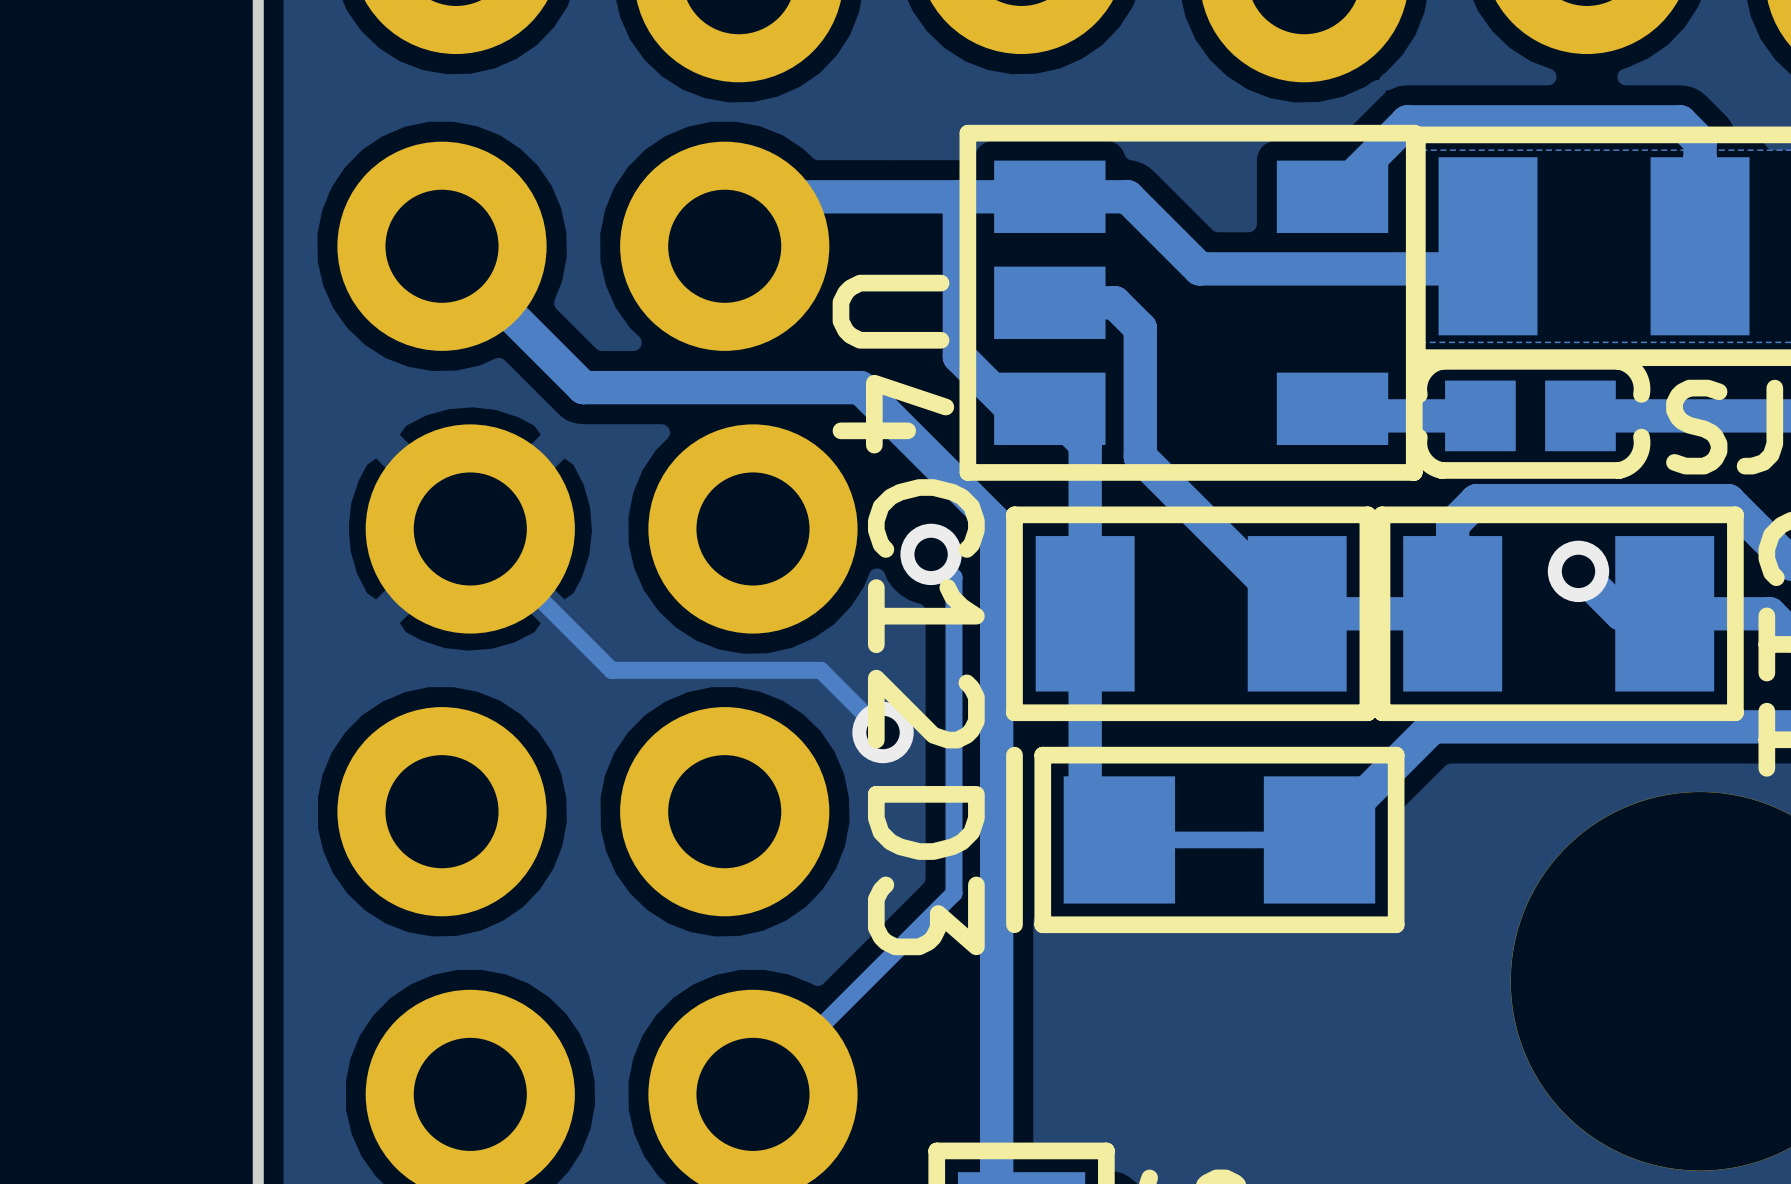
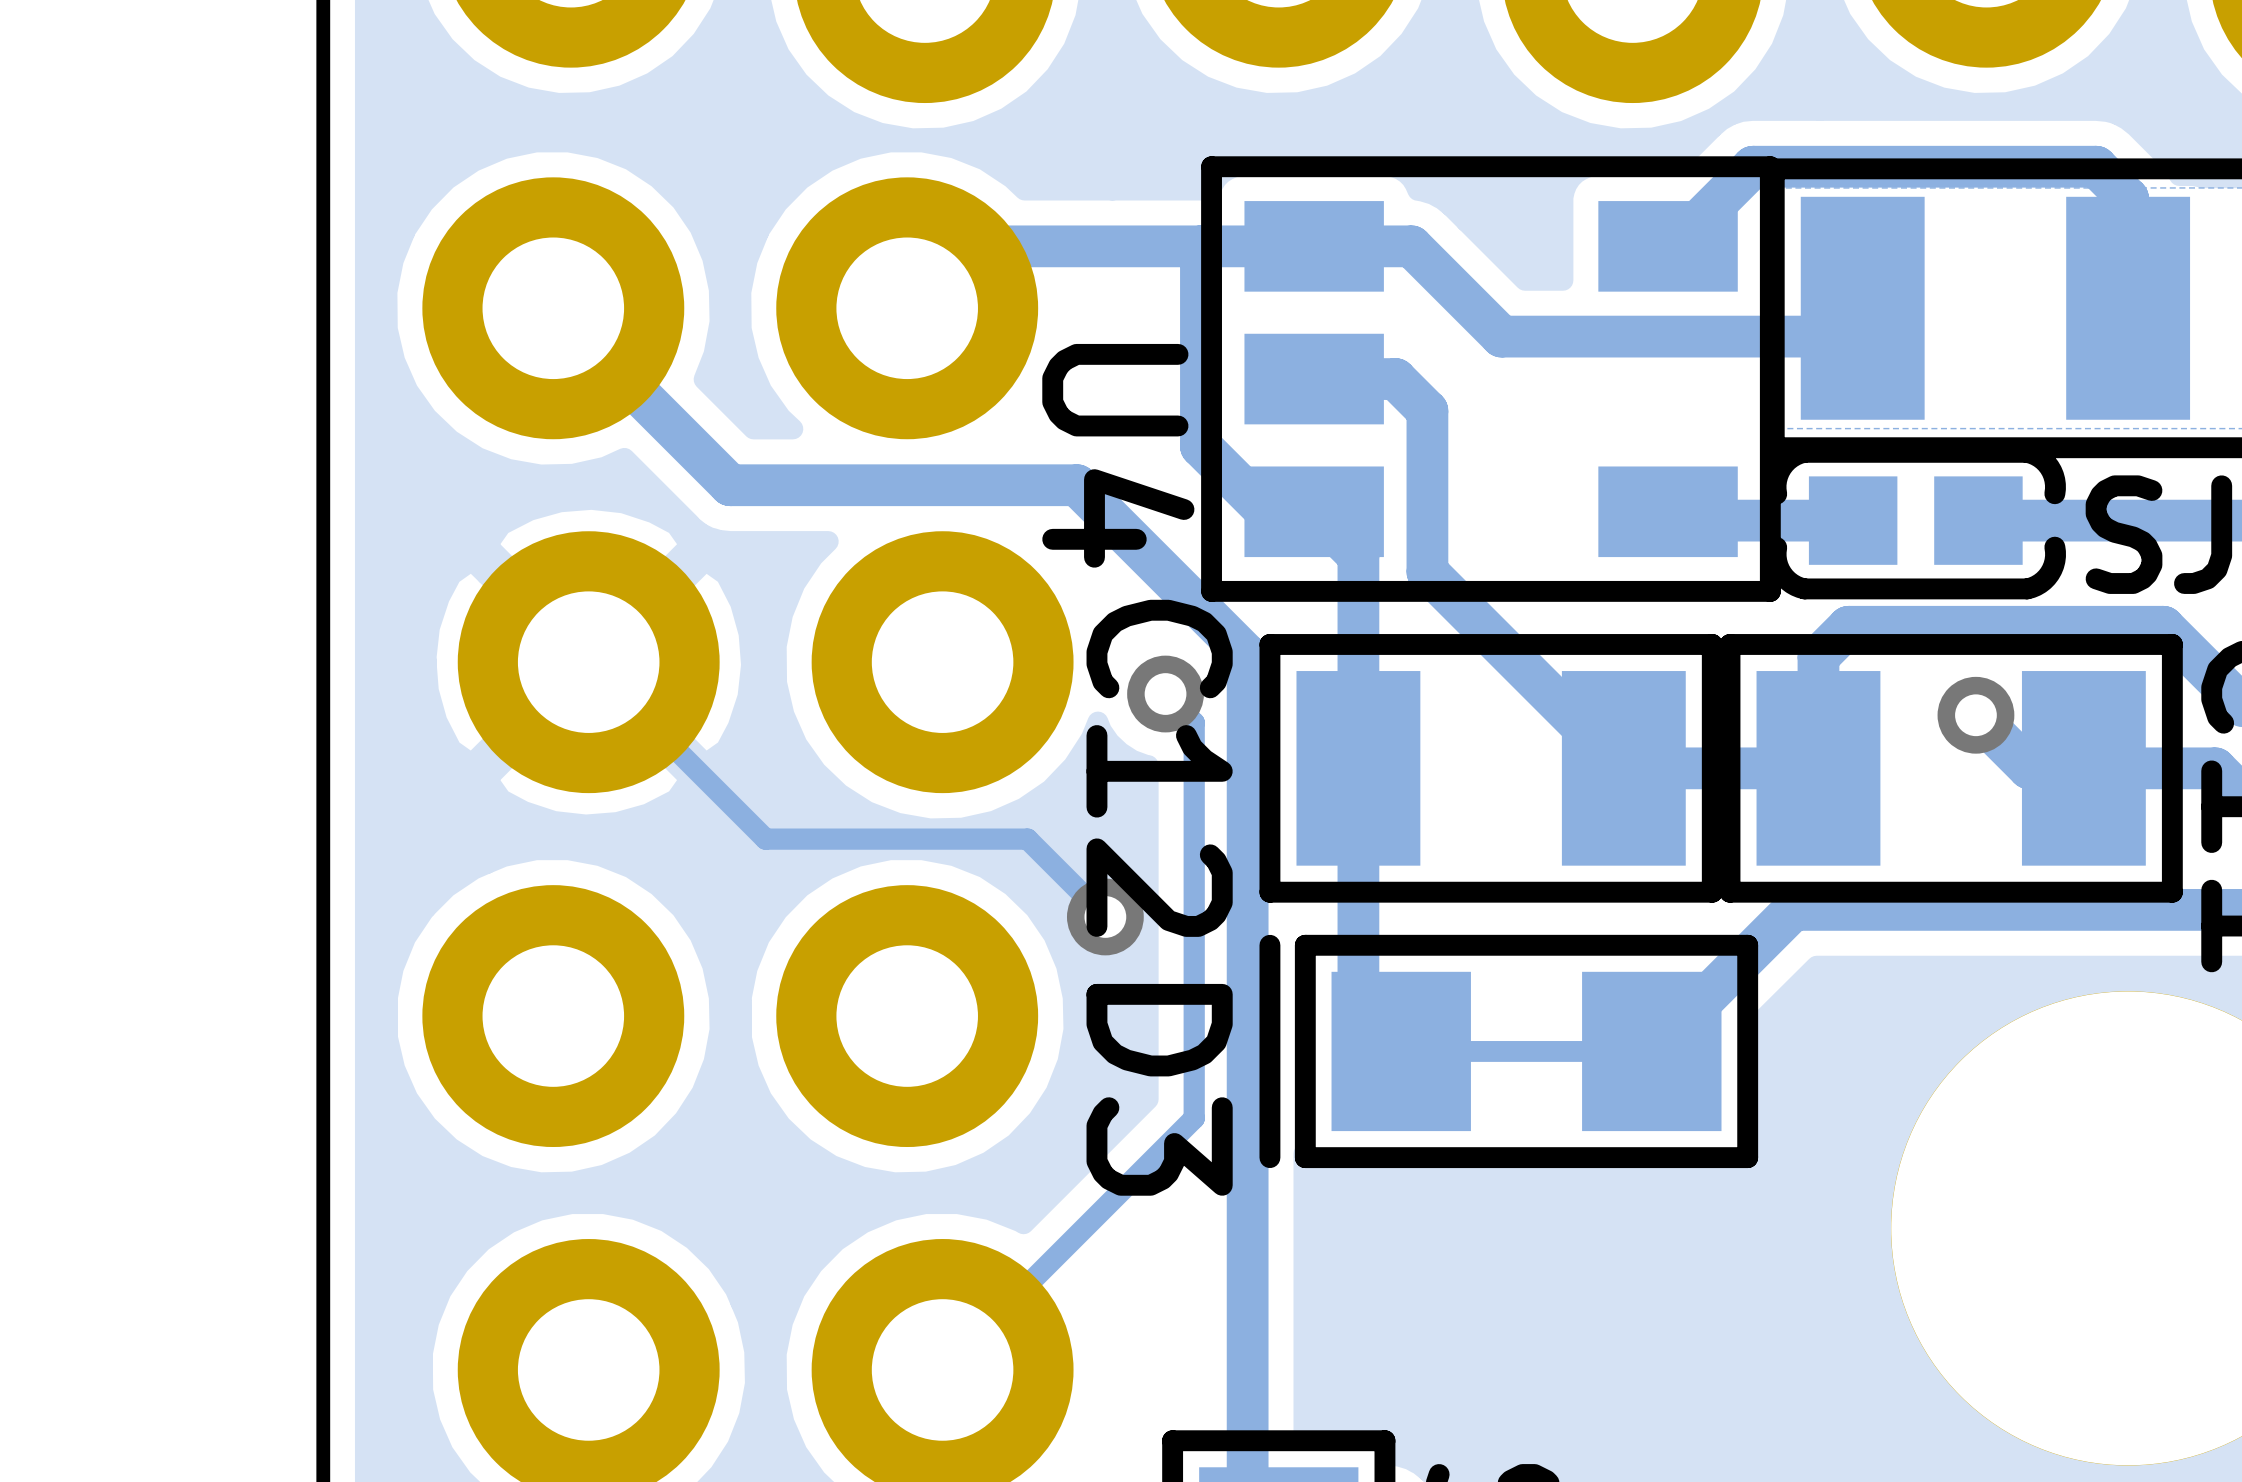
track: (1700, 158) (1700, 141) (1680, 121) (1407, 121) (1332, 196) -> (2128, 198) (2096, 166) (1753, 166) (1673, 246)

